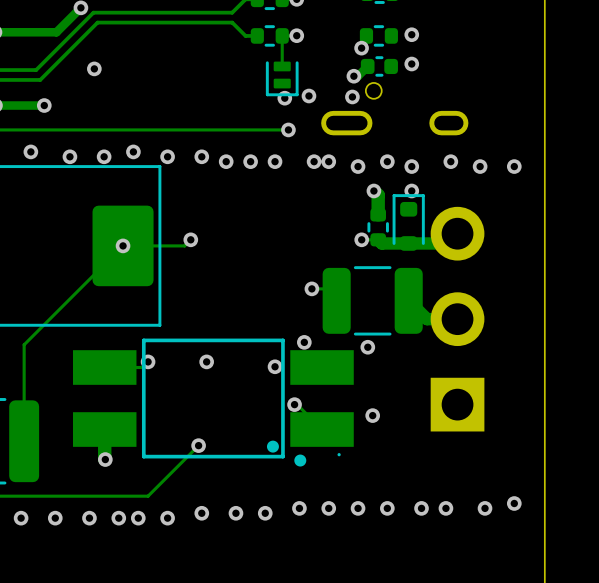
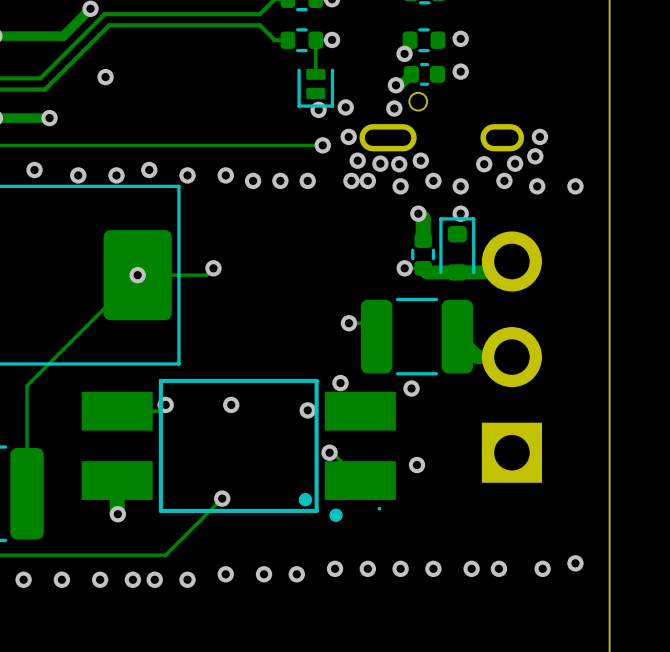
via: none -> (348, 136)
via: none -> (539, 136)
via: none -> (535, 156)
via: none -> (357, 160)
via: none -> (420, 160)
via: none -> (380, 163)
via: none -> (399, 164)
via: none -> (484, 164)
via: none -> (515, 163)

